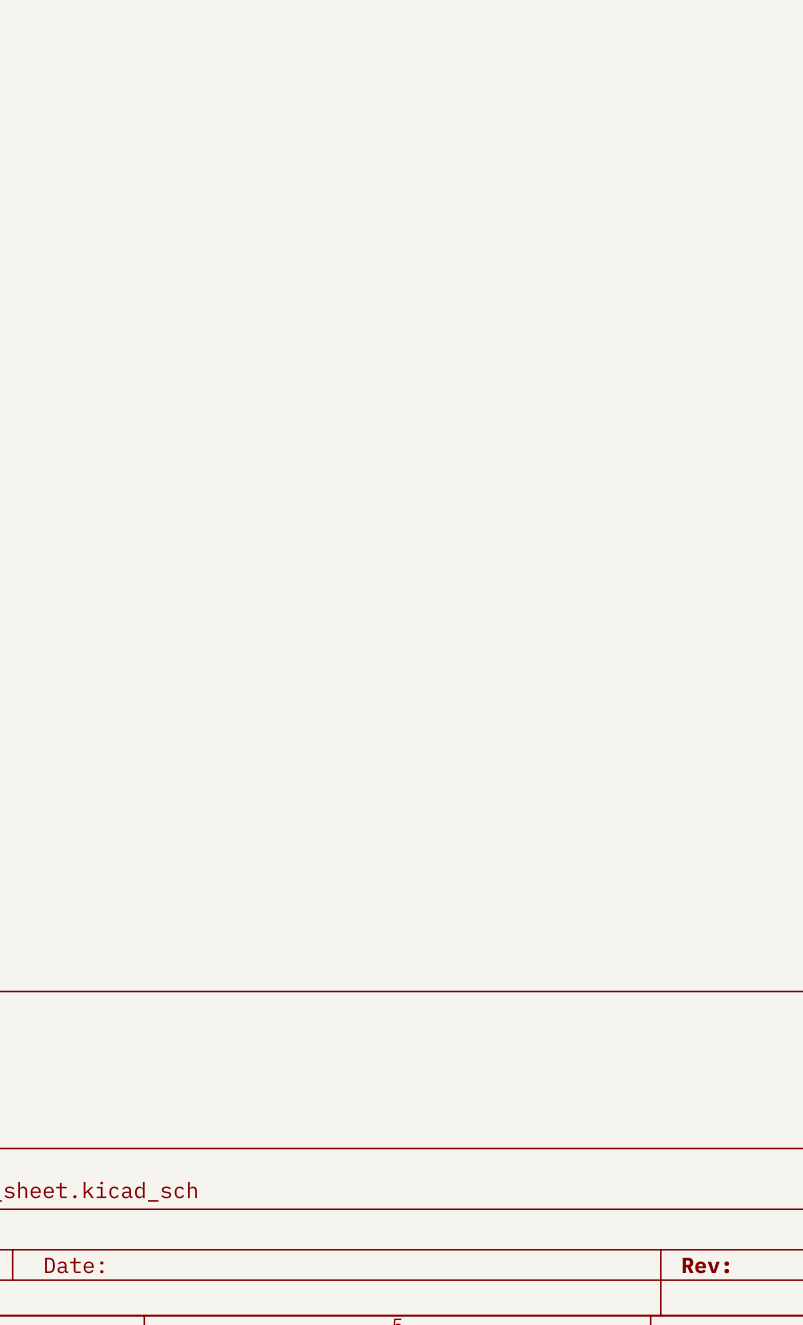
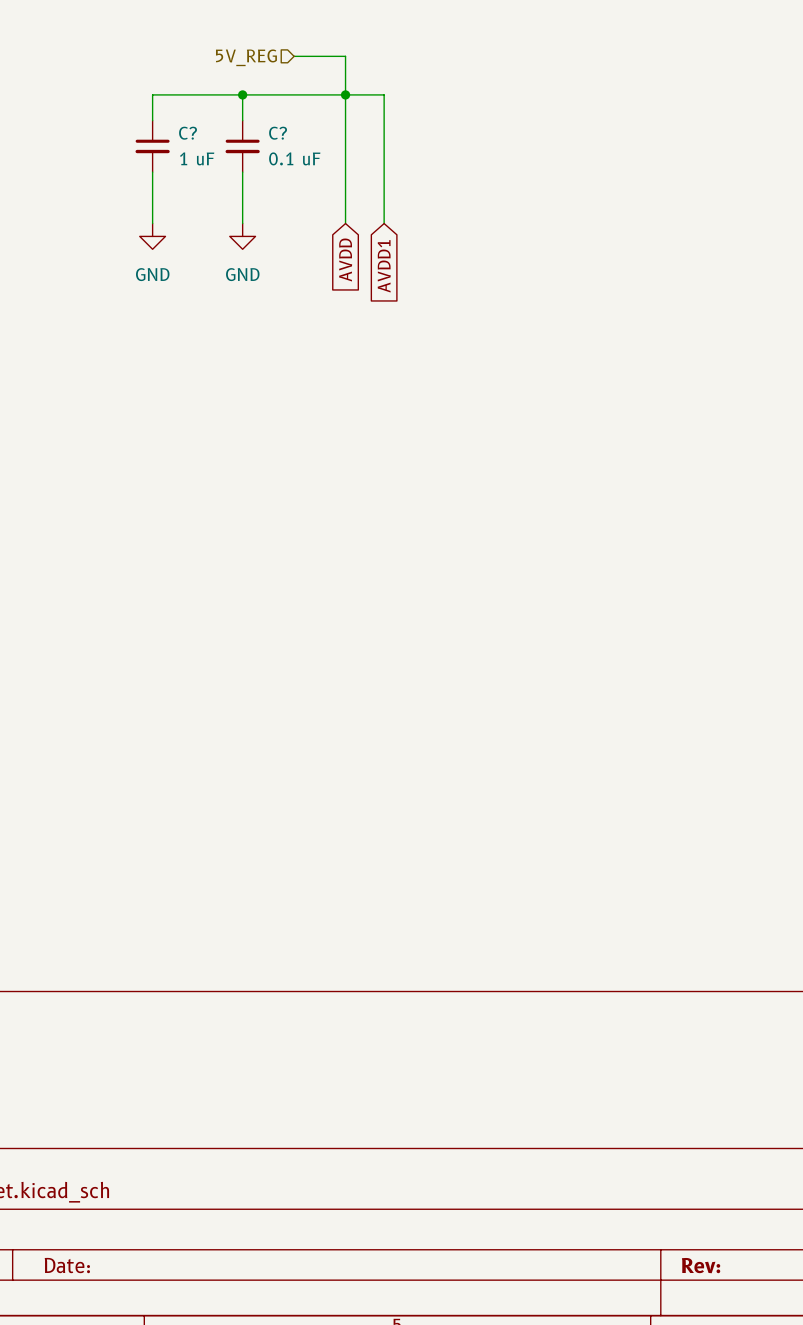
wire: none -> (294, 56) (345, 56) (345, 223)
hierarchical label: none -> 5V_REG (246, 57)
wire: none -> (242, 94) (242, 120)
junction: none -> (242, 94)
junction: none -> (345, 94)
wire: none -> (152, 120) (152, 94) (384, 94) (384, 223)
C?: none -> 1 uF (152, 146)
C?: none -> 0.1 uF (242, 146)
wire: none -> (152, 172) (152, 223)
wire: none -> (242, 172) (242, 223)
power symbol: none -> GND (152, 236)
power symbol: none -> GND (242, 236)
global label: none -> AVDD (345, 260)
global label: none -> AVDD1 (384, 266)

